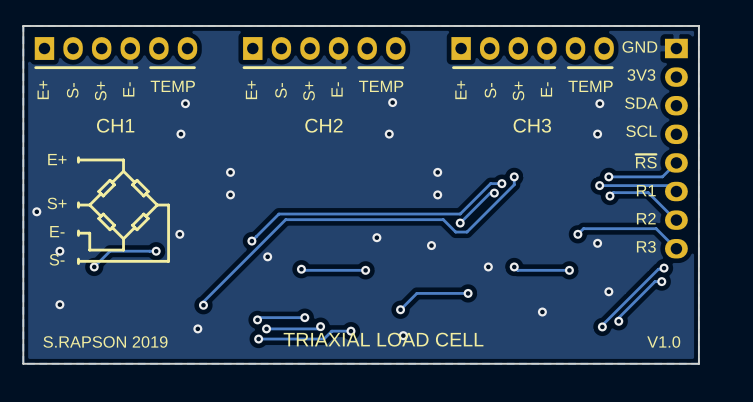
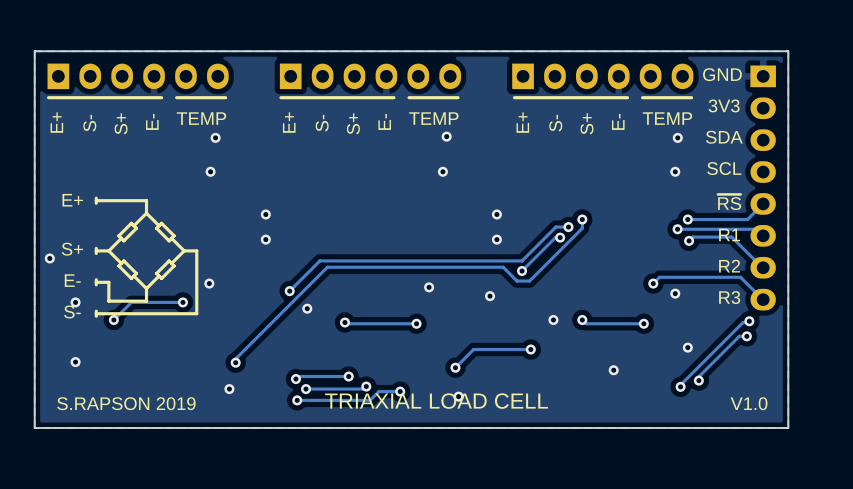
text: CH1 (115, 125) -> none
text: CH2 (323, 125) -> none
text: CH3 (532, 125) -> none

